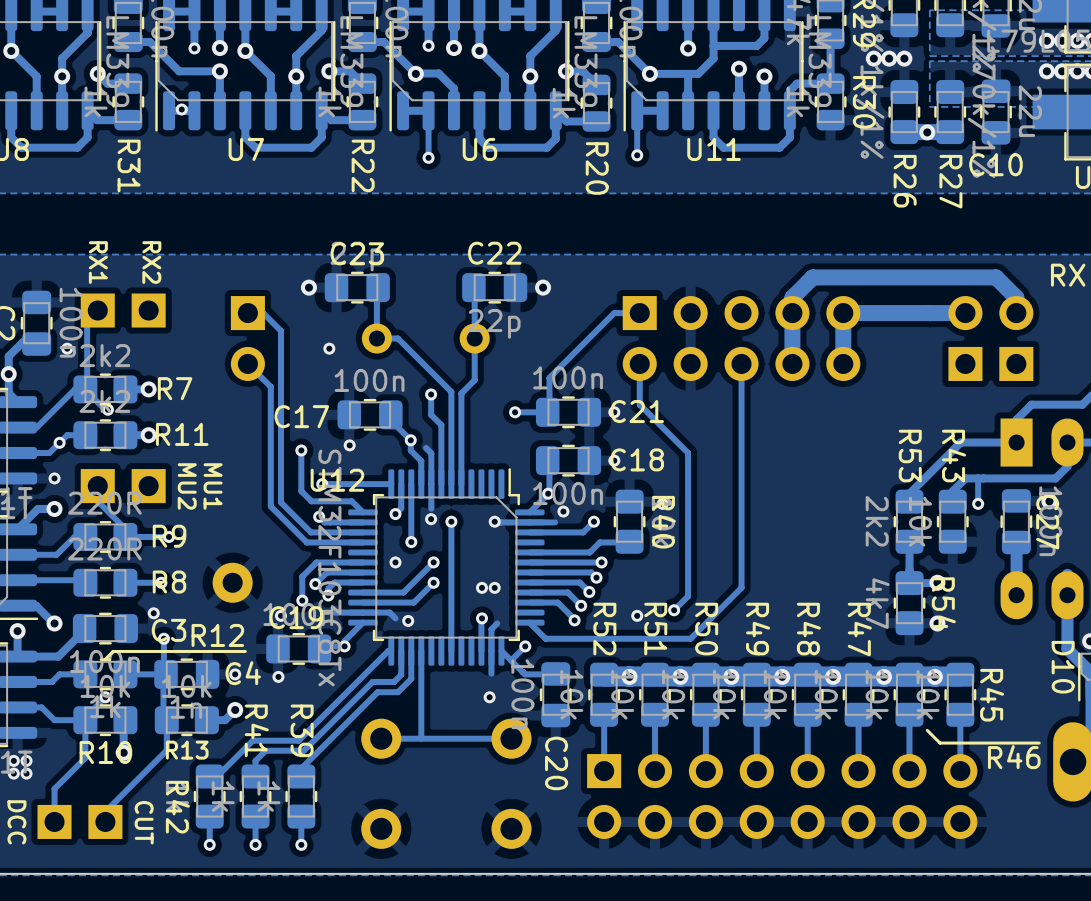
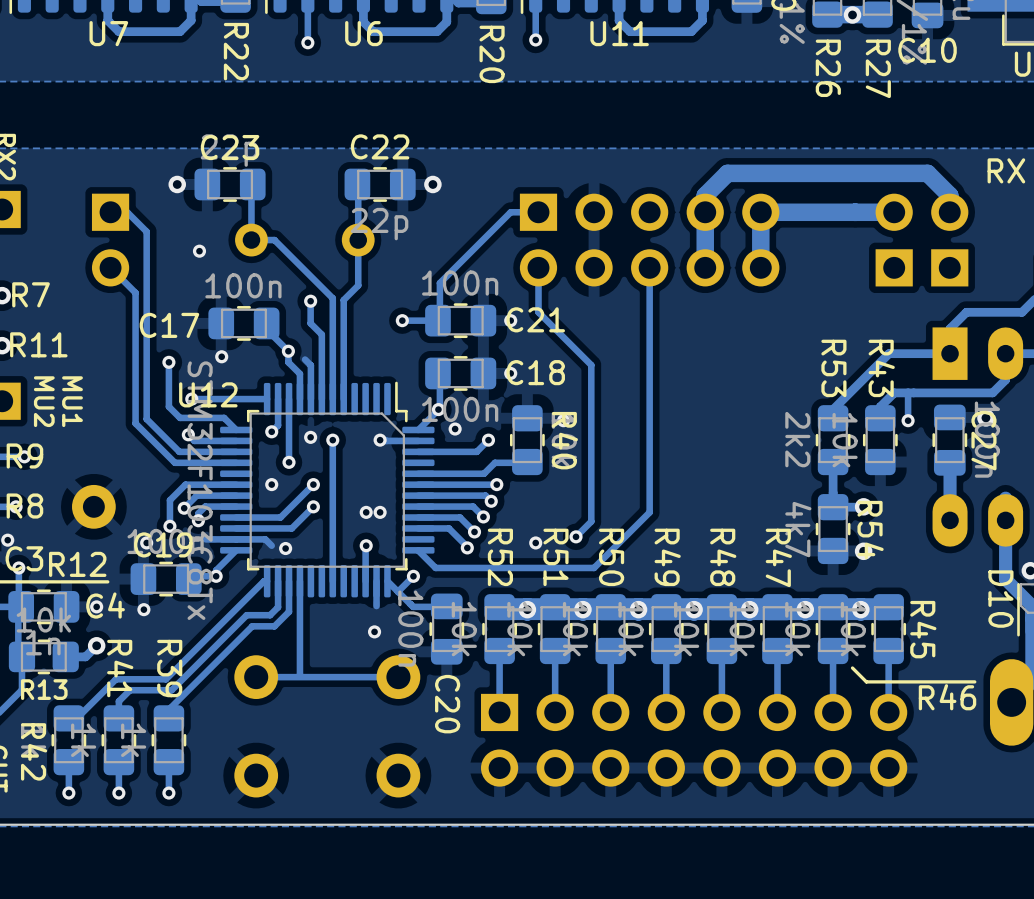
track: (431, 484) (431, 508) -> none
track: (555, 522) (529, 522) -> none
track: (497, 623) (491, 629) (491, 650) -> none

